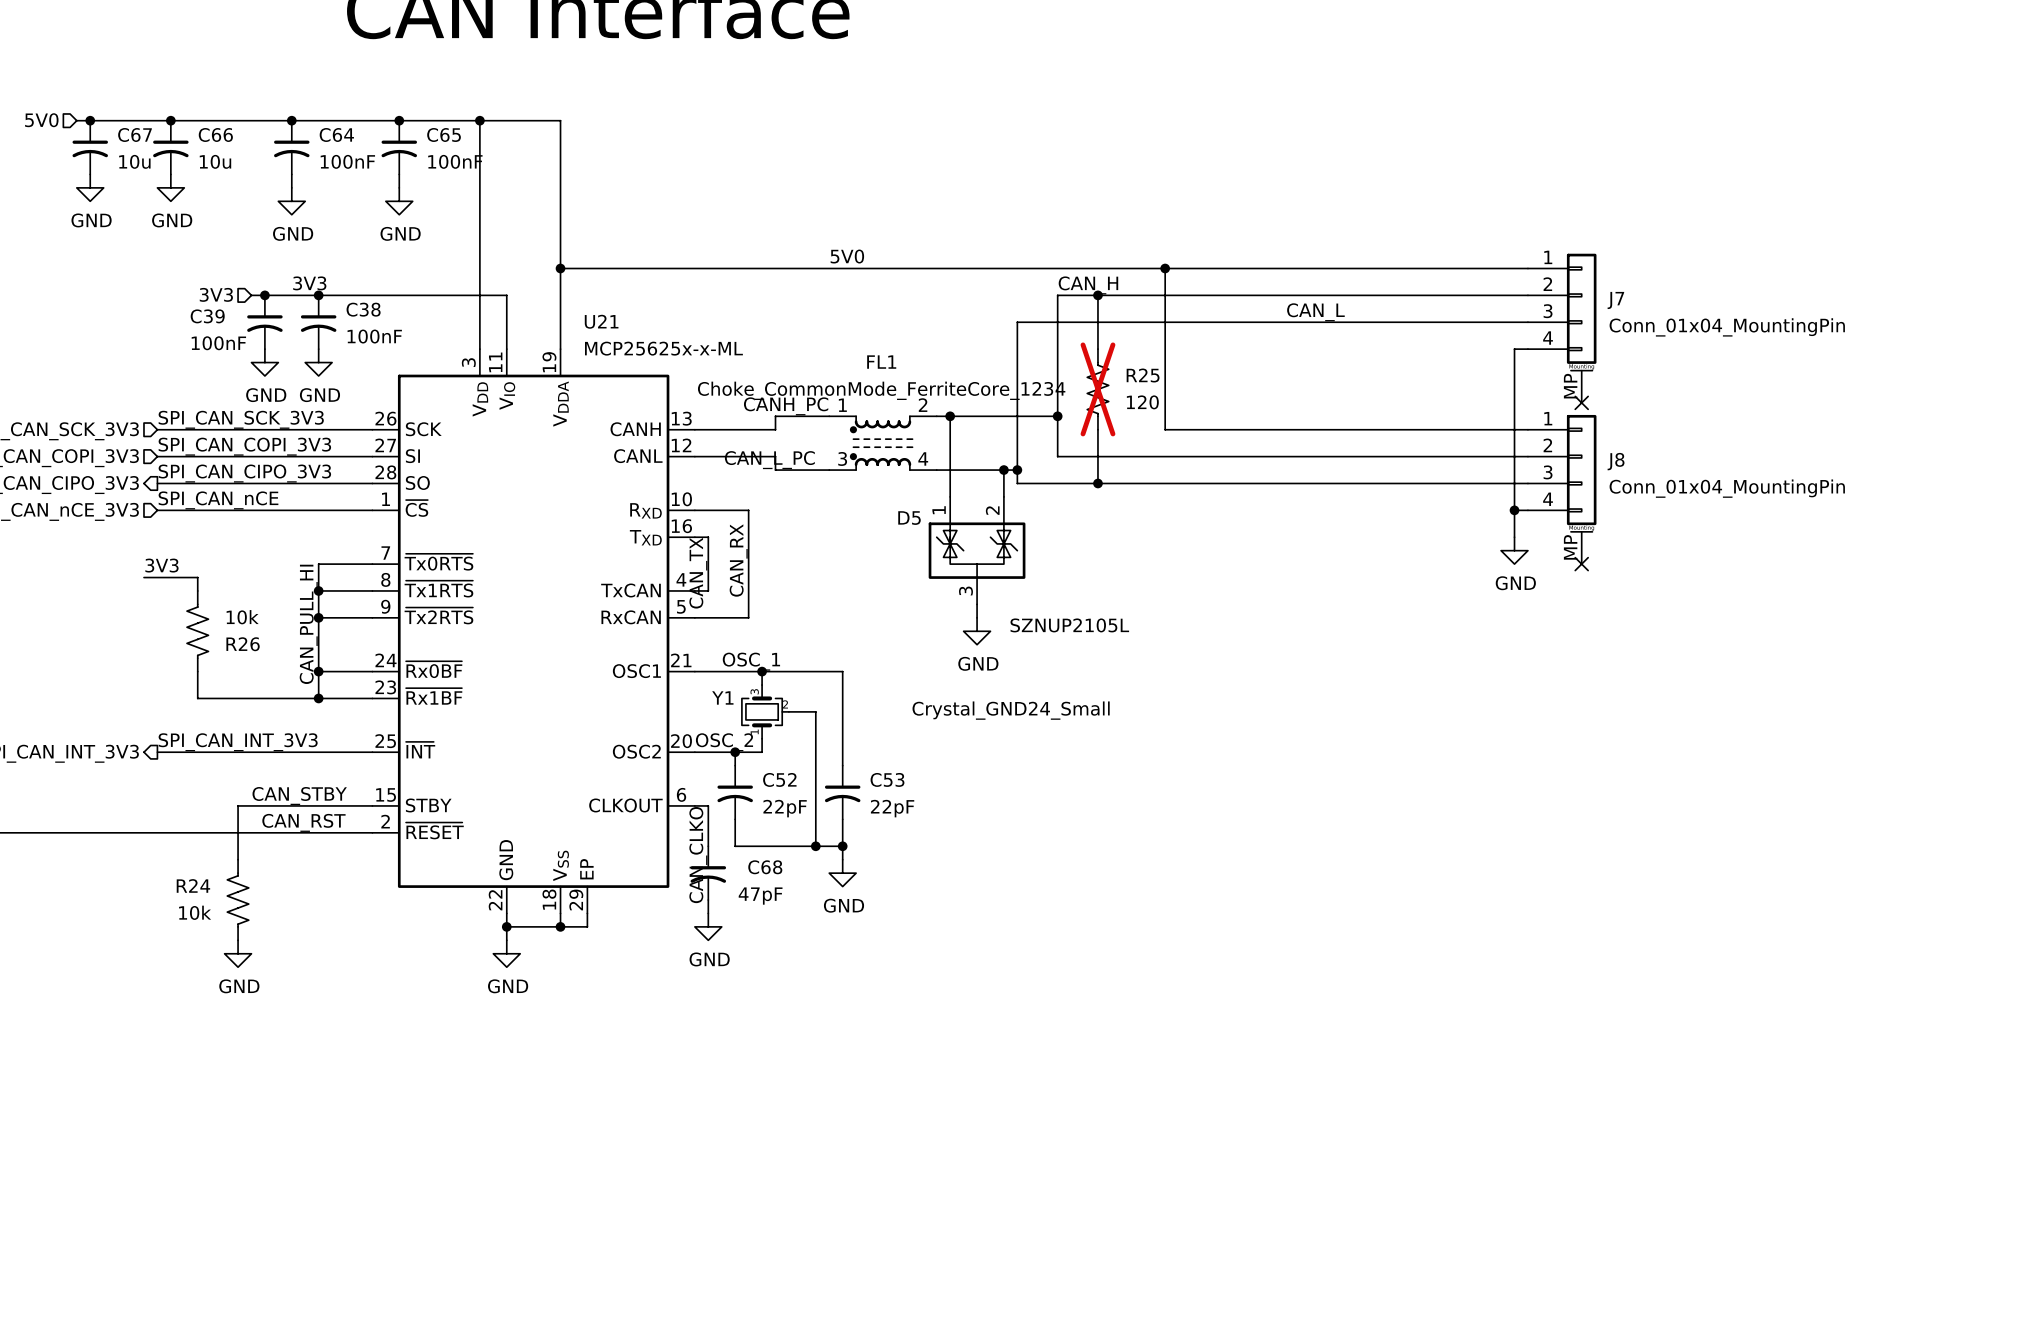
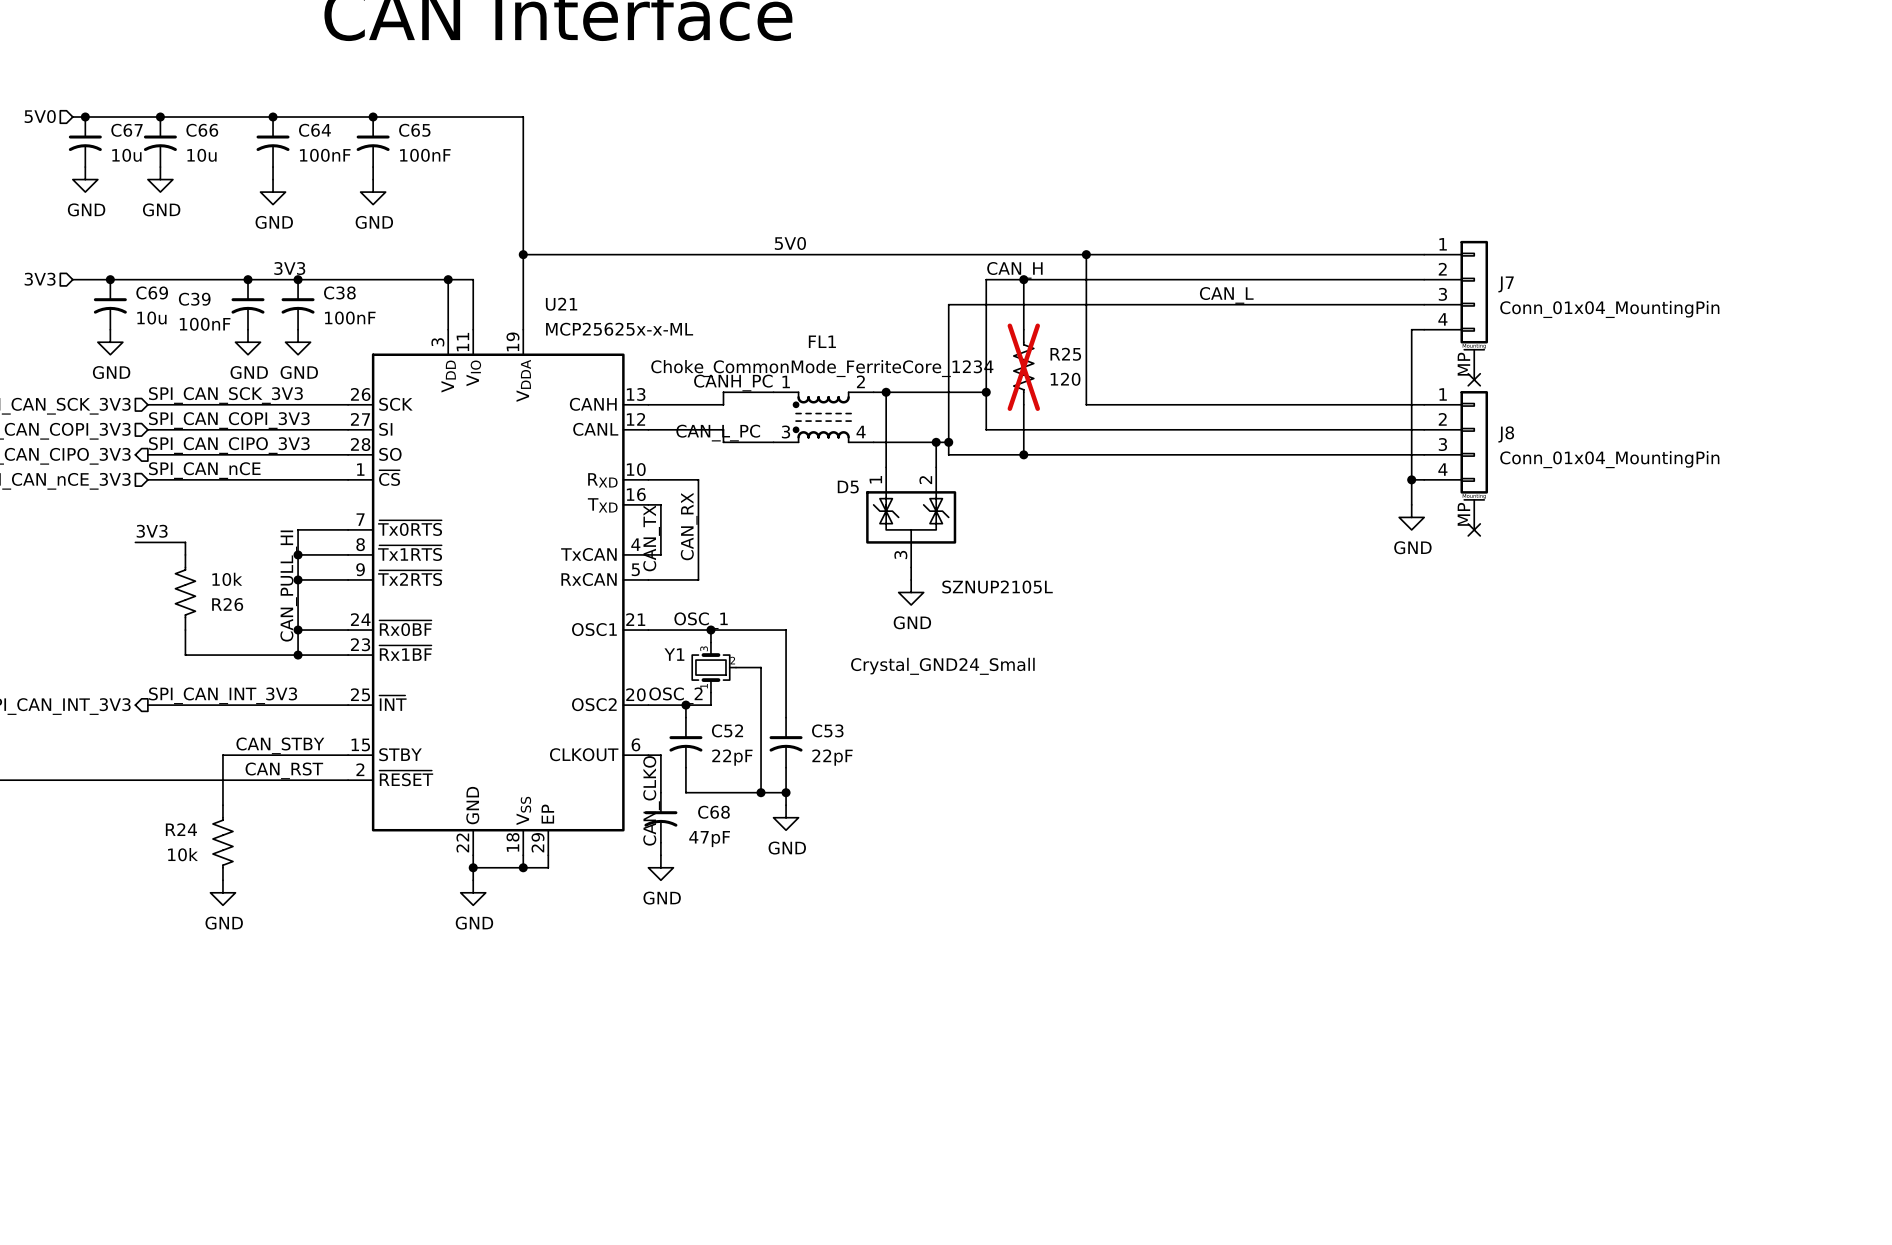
wire: (479, 120) (479, 295) -> none
junction: (479, 120) -> none
hierarchical label position: 3V3 (216, 294) -> 3V3 (40, 279)
wire: none -> (72, 279) (235, 279)
junction: none -> (110, 279)
junction: none -> (448, 279)
C69: none -> 10u (110, 304)
power symbol: none -> GND (110, 342)

